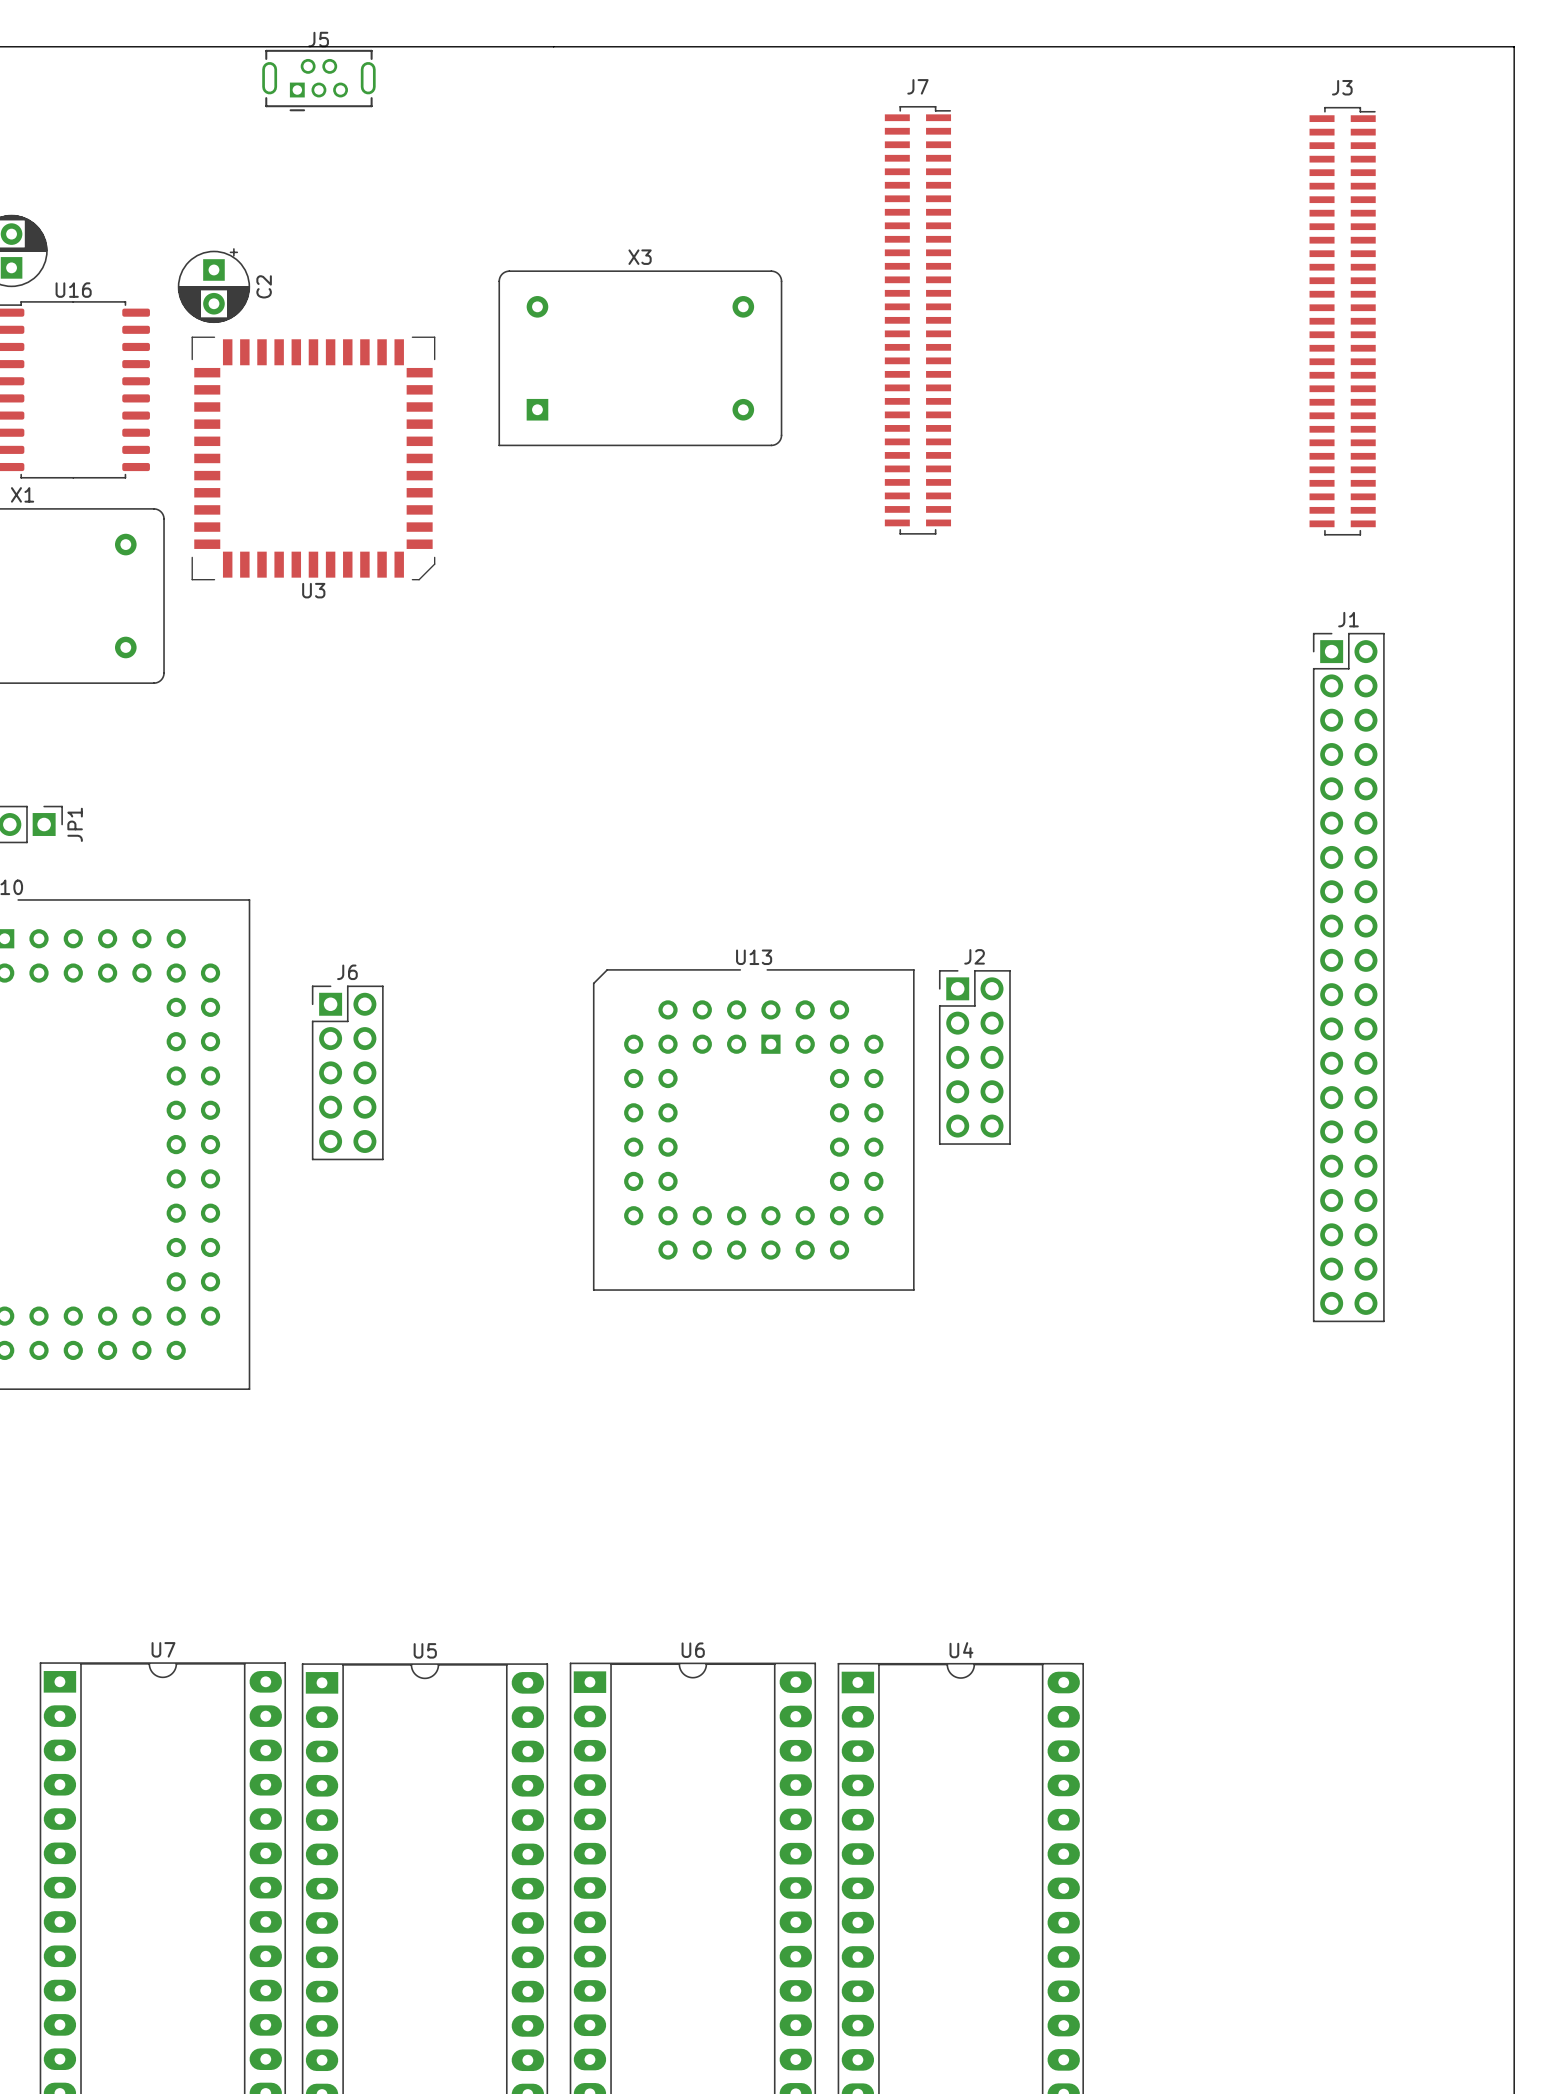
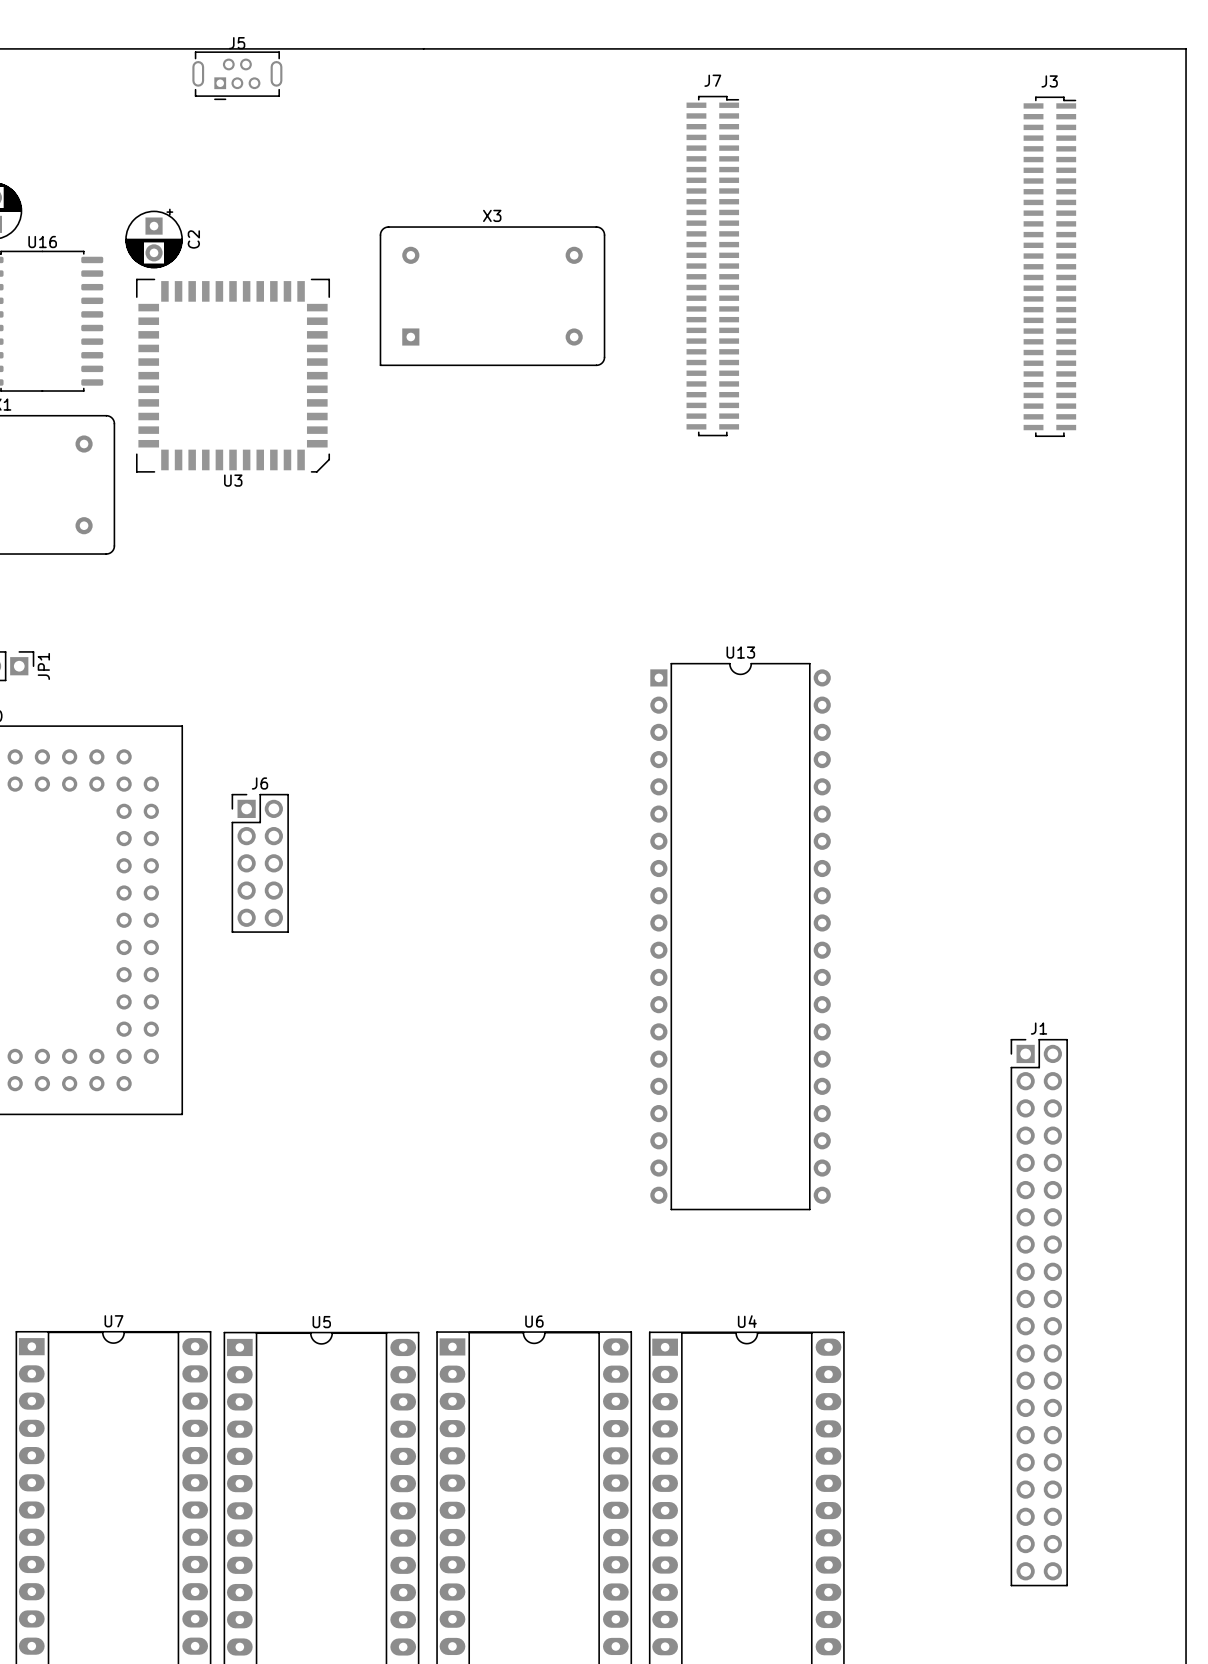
U13 name position: U13 (754, 957) -> U13 (740, 652)
U13 footprint: [592, 969, 915, 1291] -> [650, 663, 831, 1211]
J1 position: (1348, 977) -> (1039, 1312)
J2: (974, 1057) -> none

